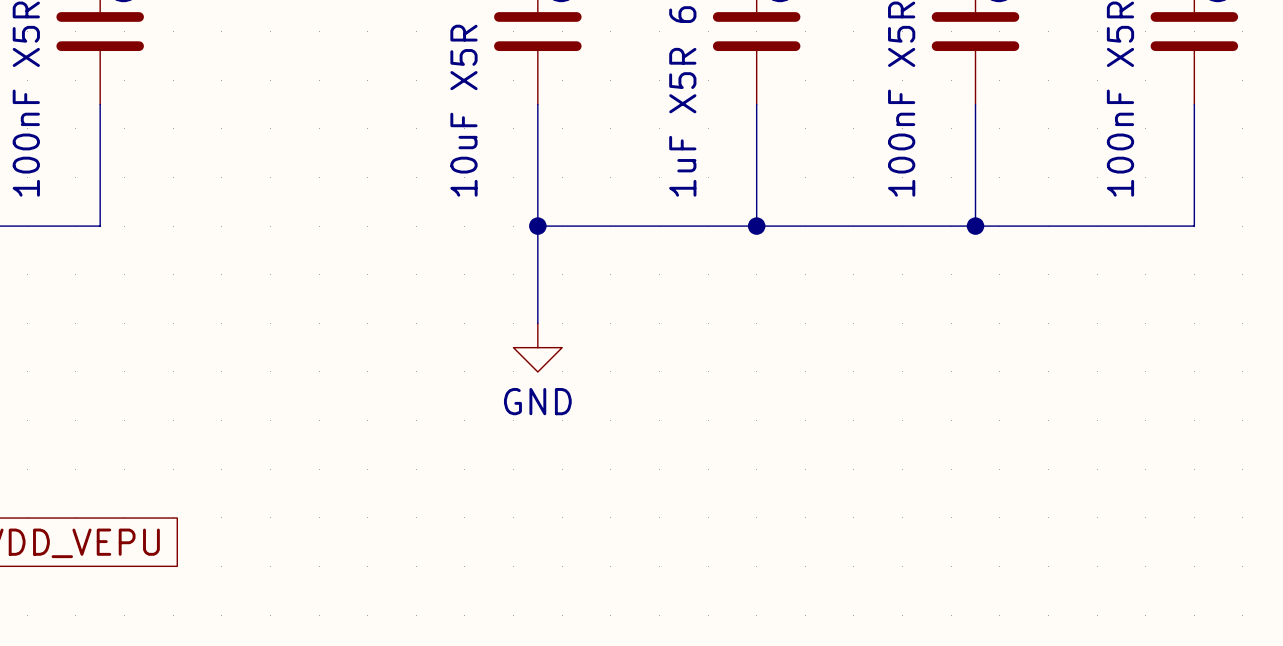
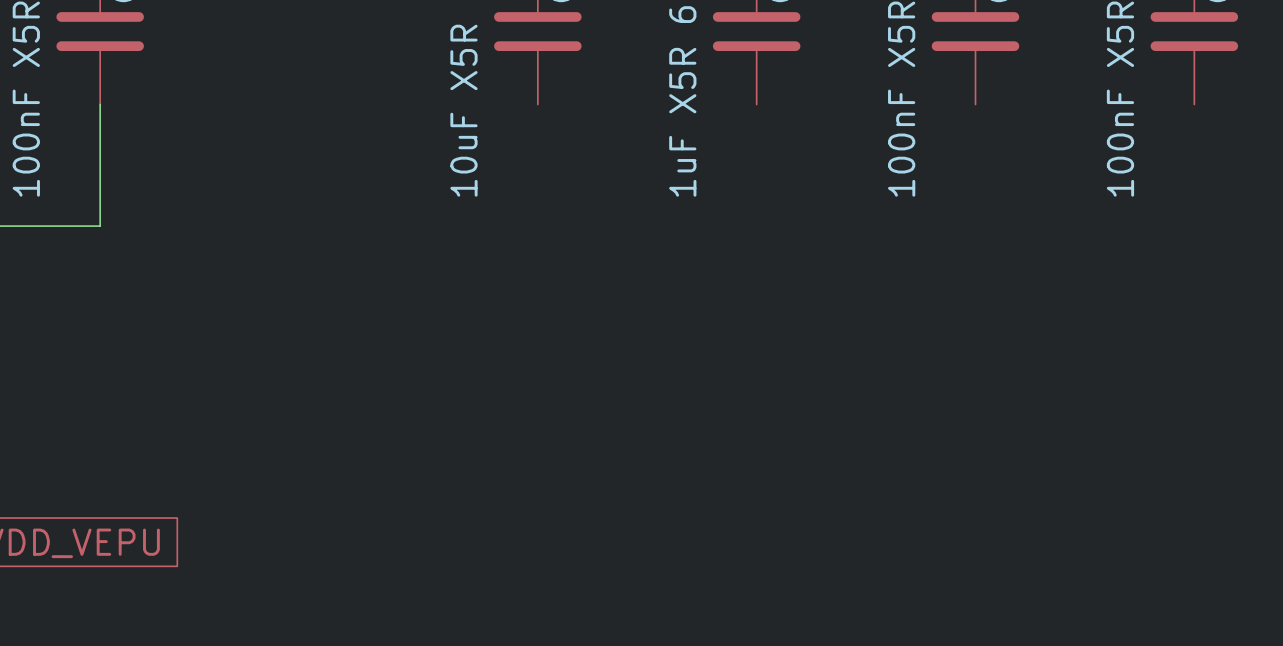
wire: (537, 104) (537, 323) -> none
wire: (756, 104) (756, 226) -> none
wire: (975, 104) (975, 226) -> none
wire: (1194, 104) (1194, 226) (537, 226) -> none
junction: (537, 226) -> none
junction: (756, 226) -> none
junction: (975, 226) -> none
power symbol: GND (537, 347) -> none

